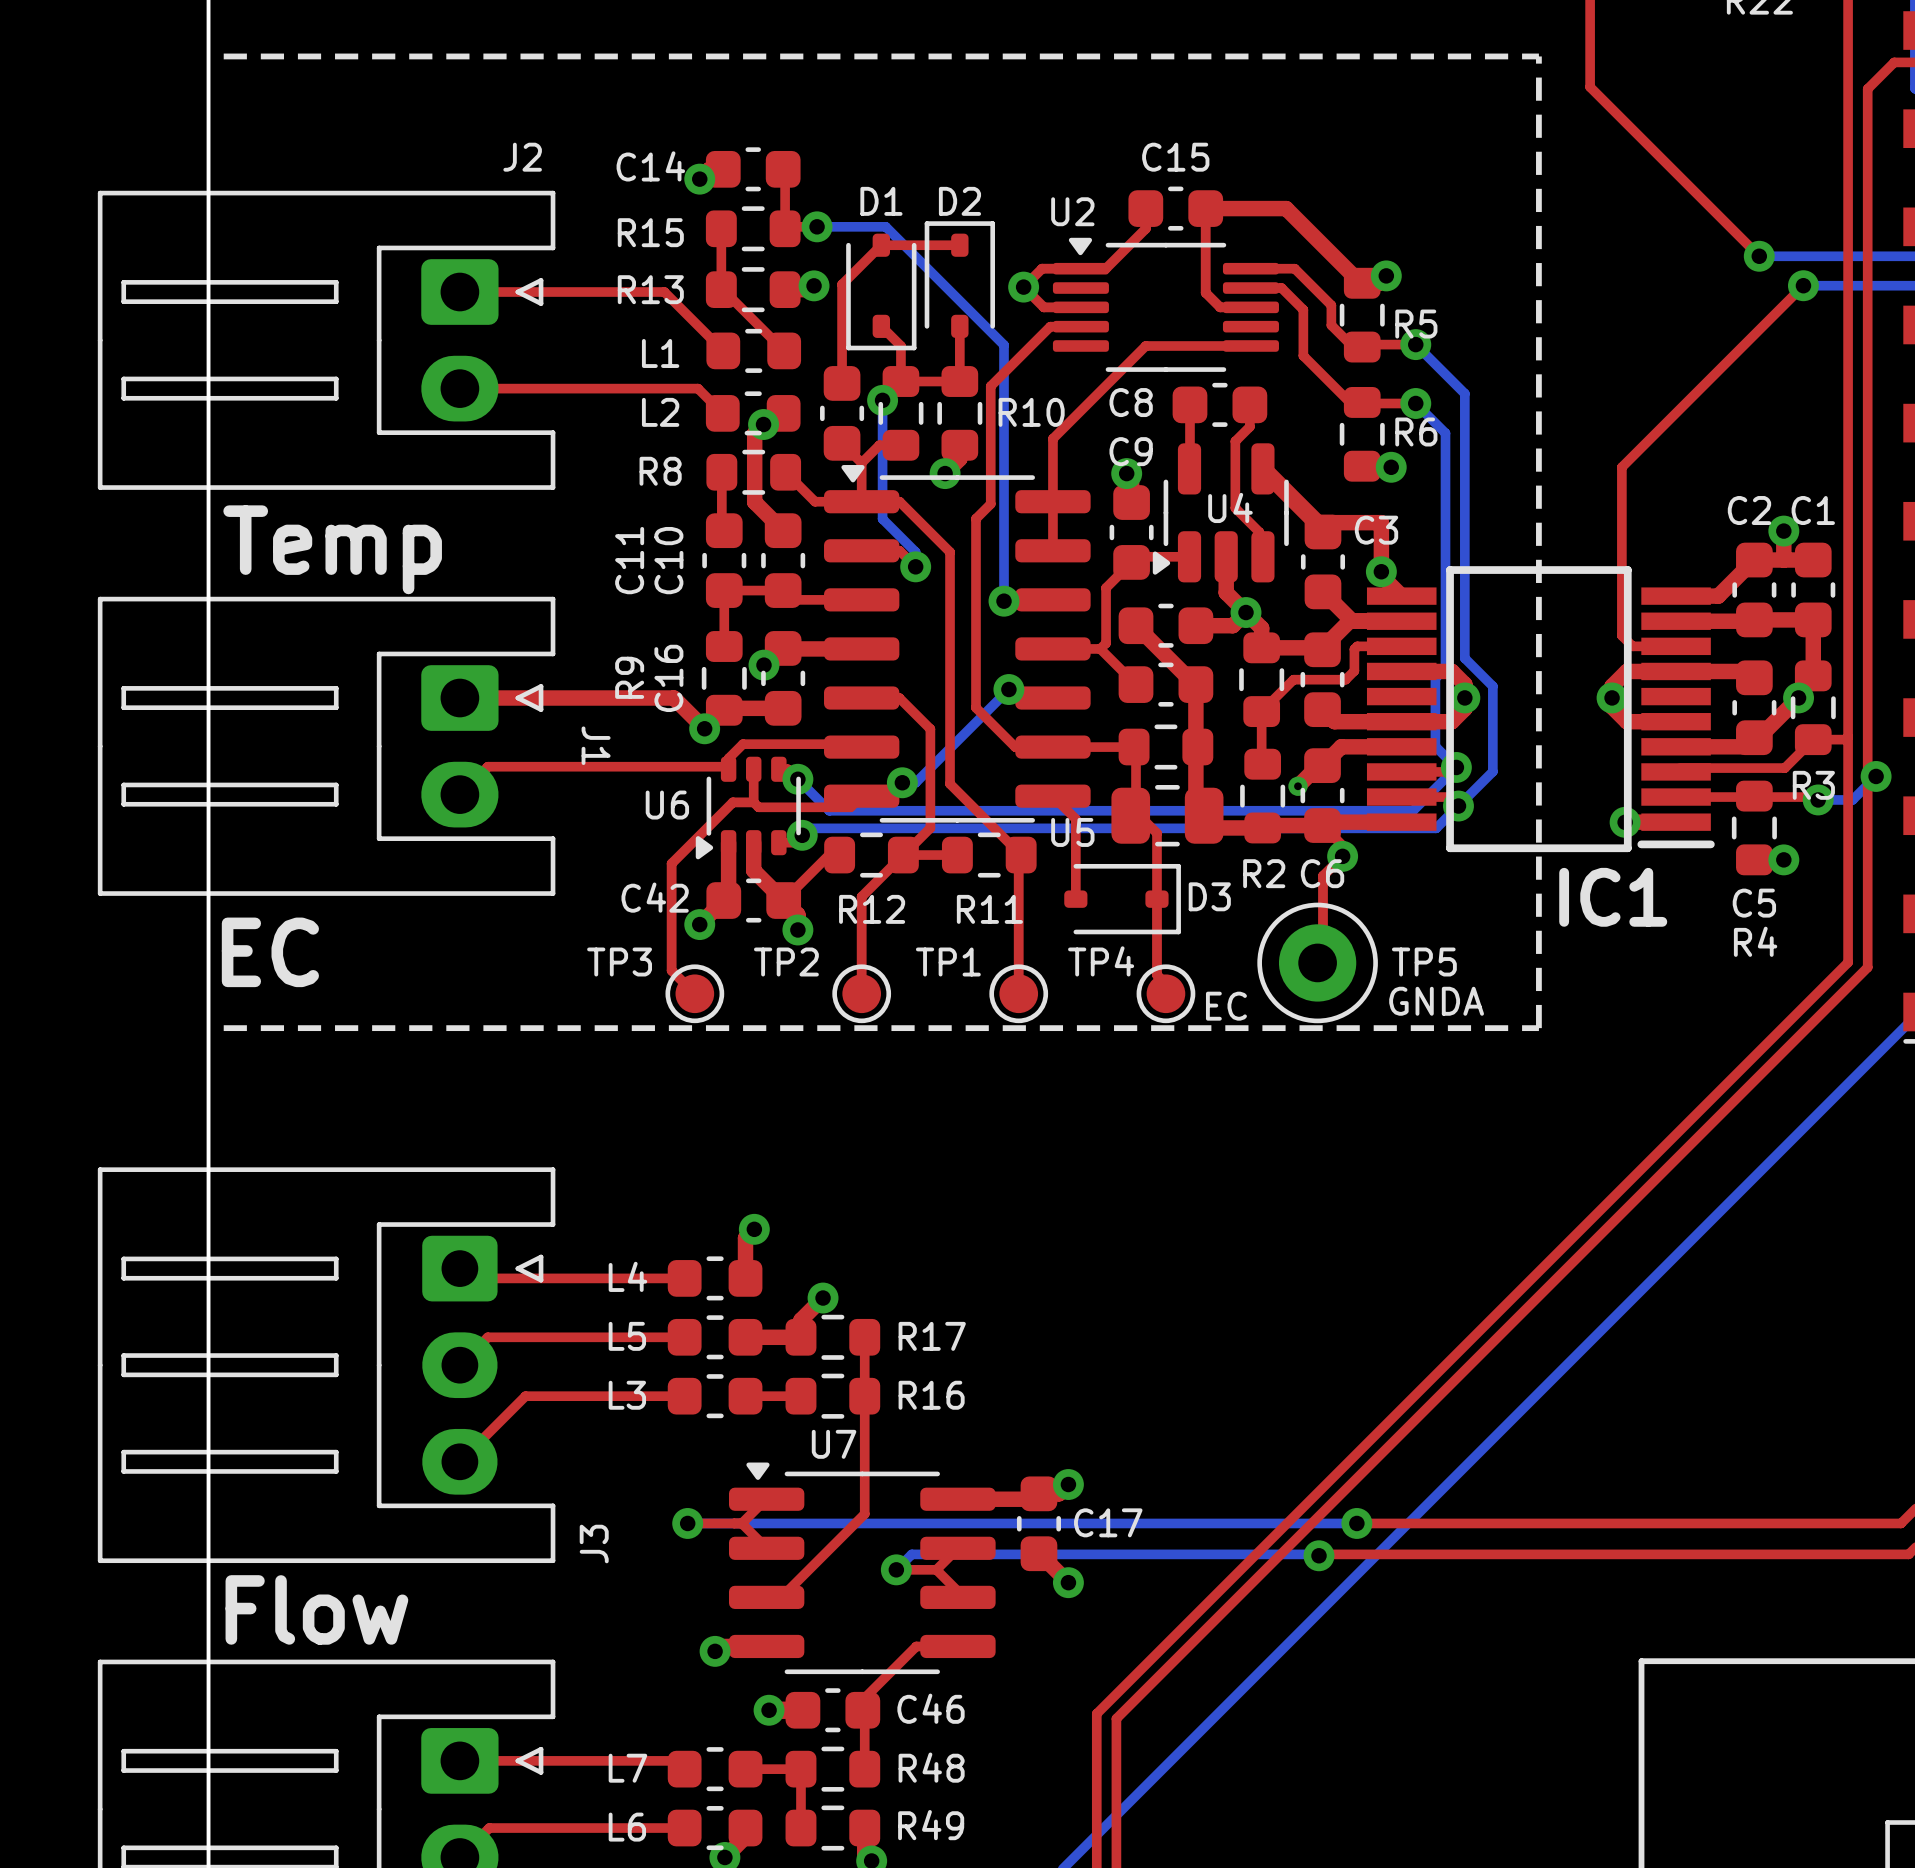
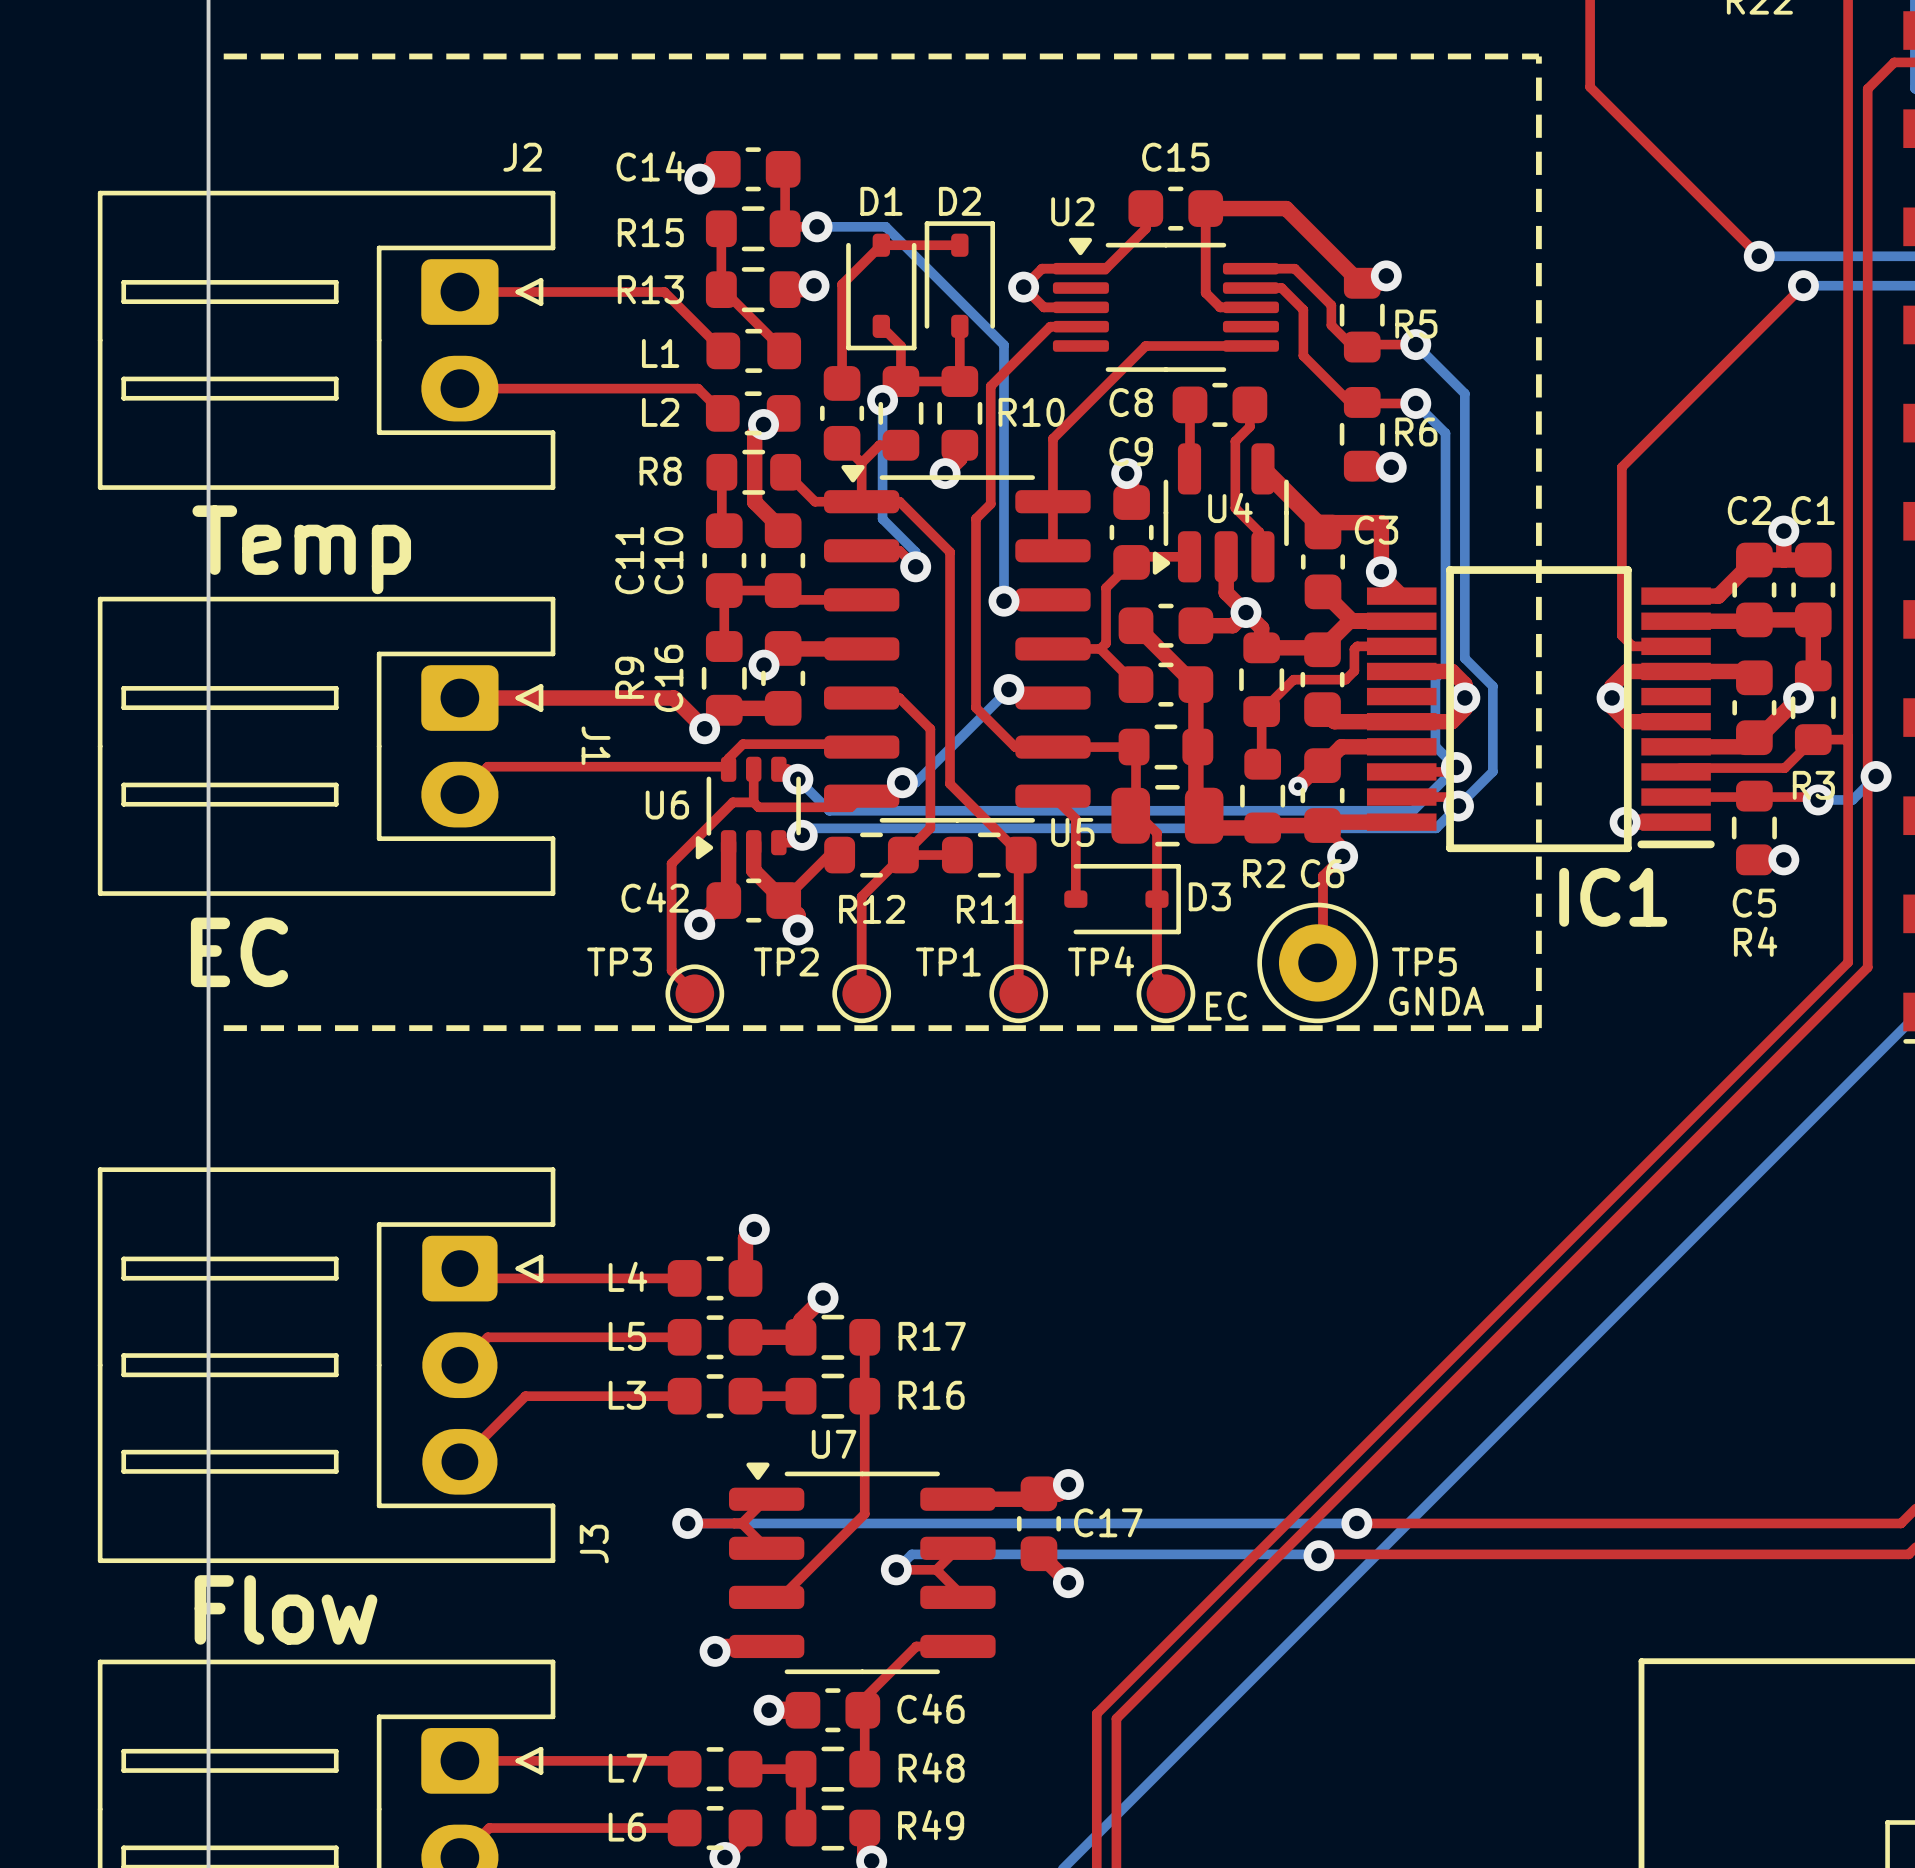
J2 value position: Temp (332, 549) -> Temp (301, 549)
J1 value position: EC (270, 952) -> EC (239, 952)
J3 value position: Flow (316, 1609) -> Flow (285, 1609)

